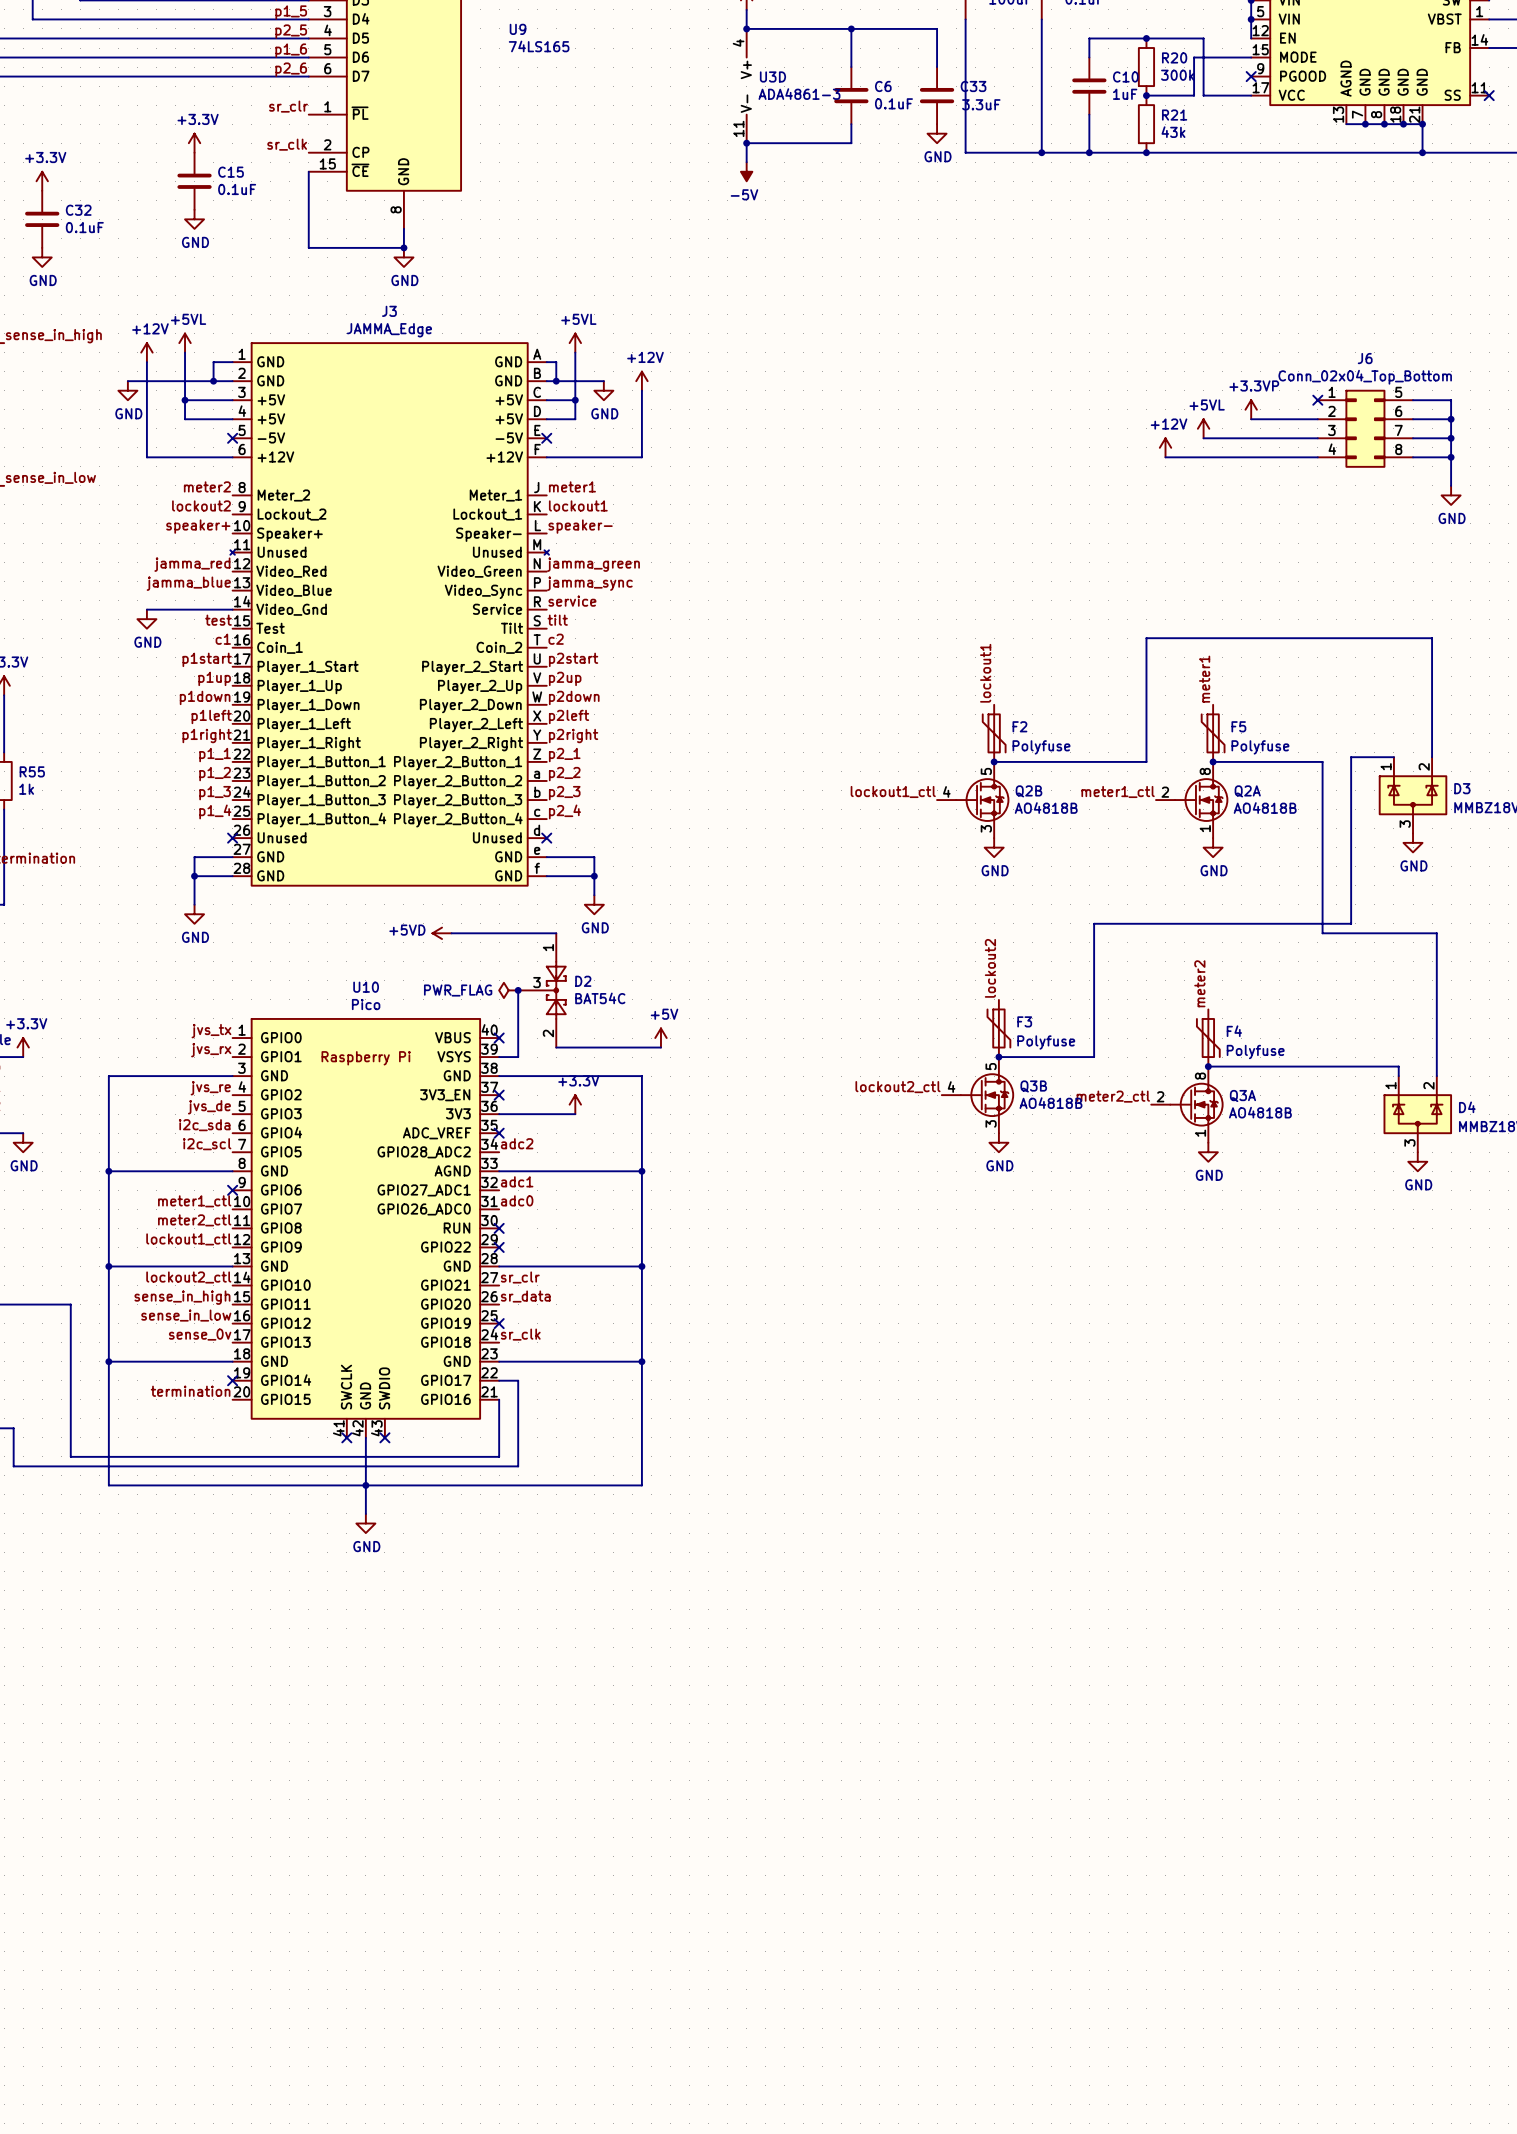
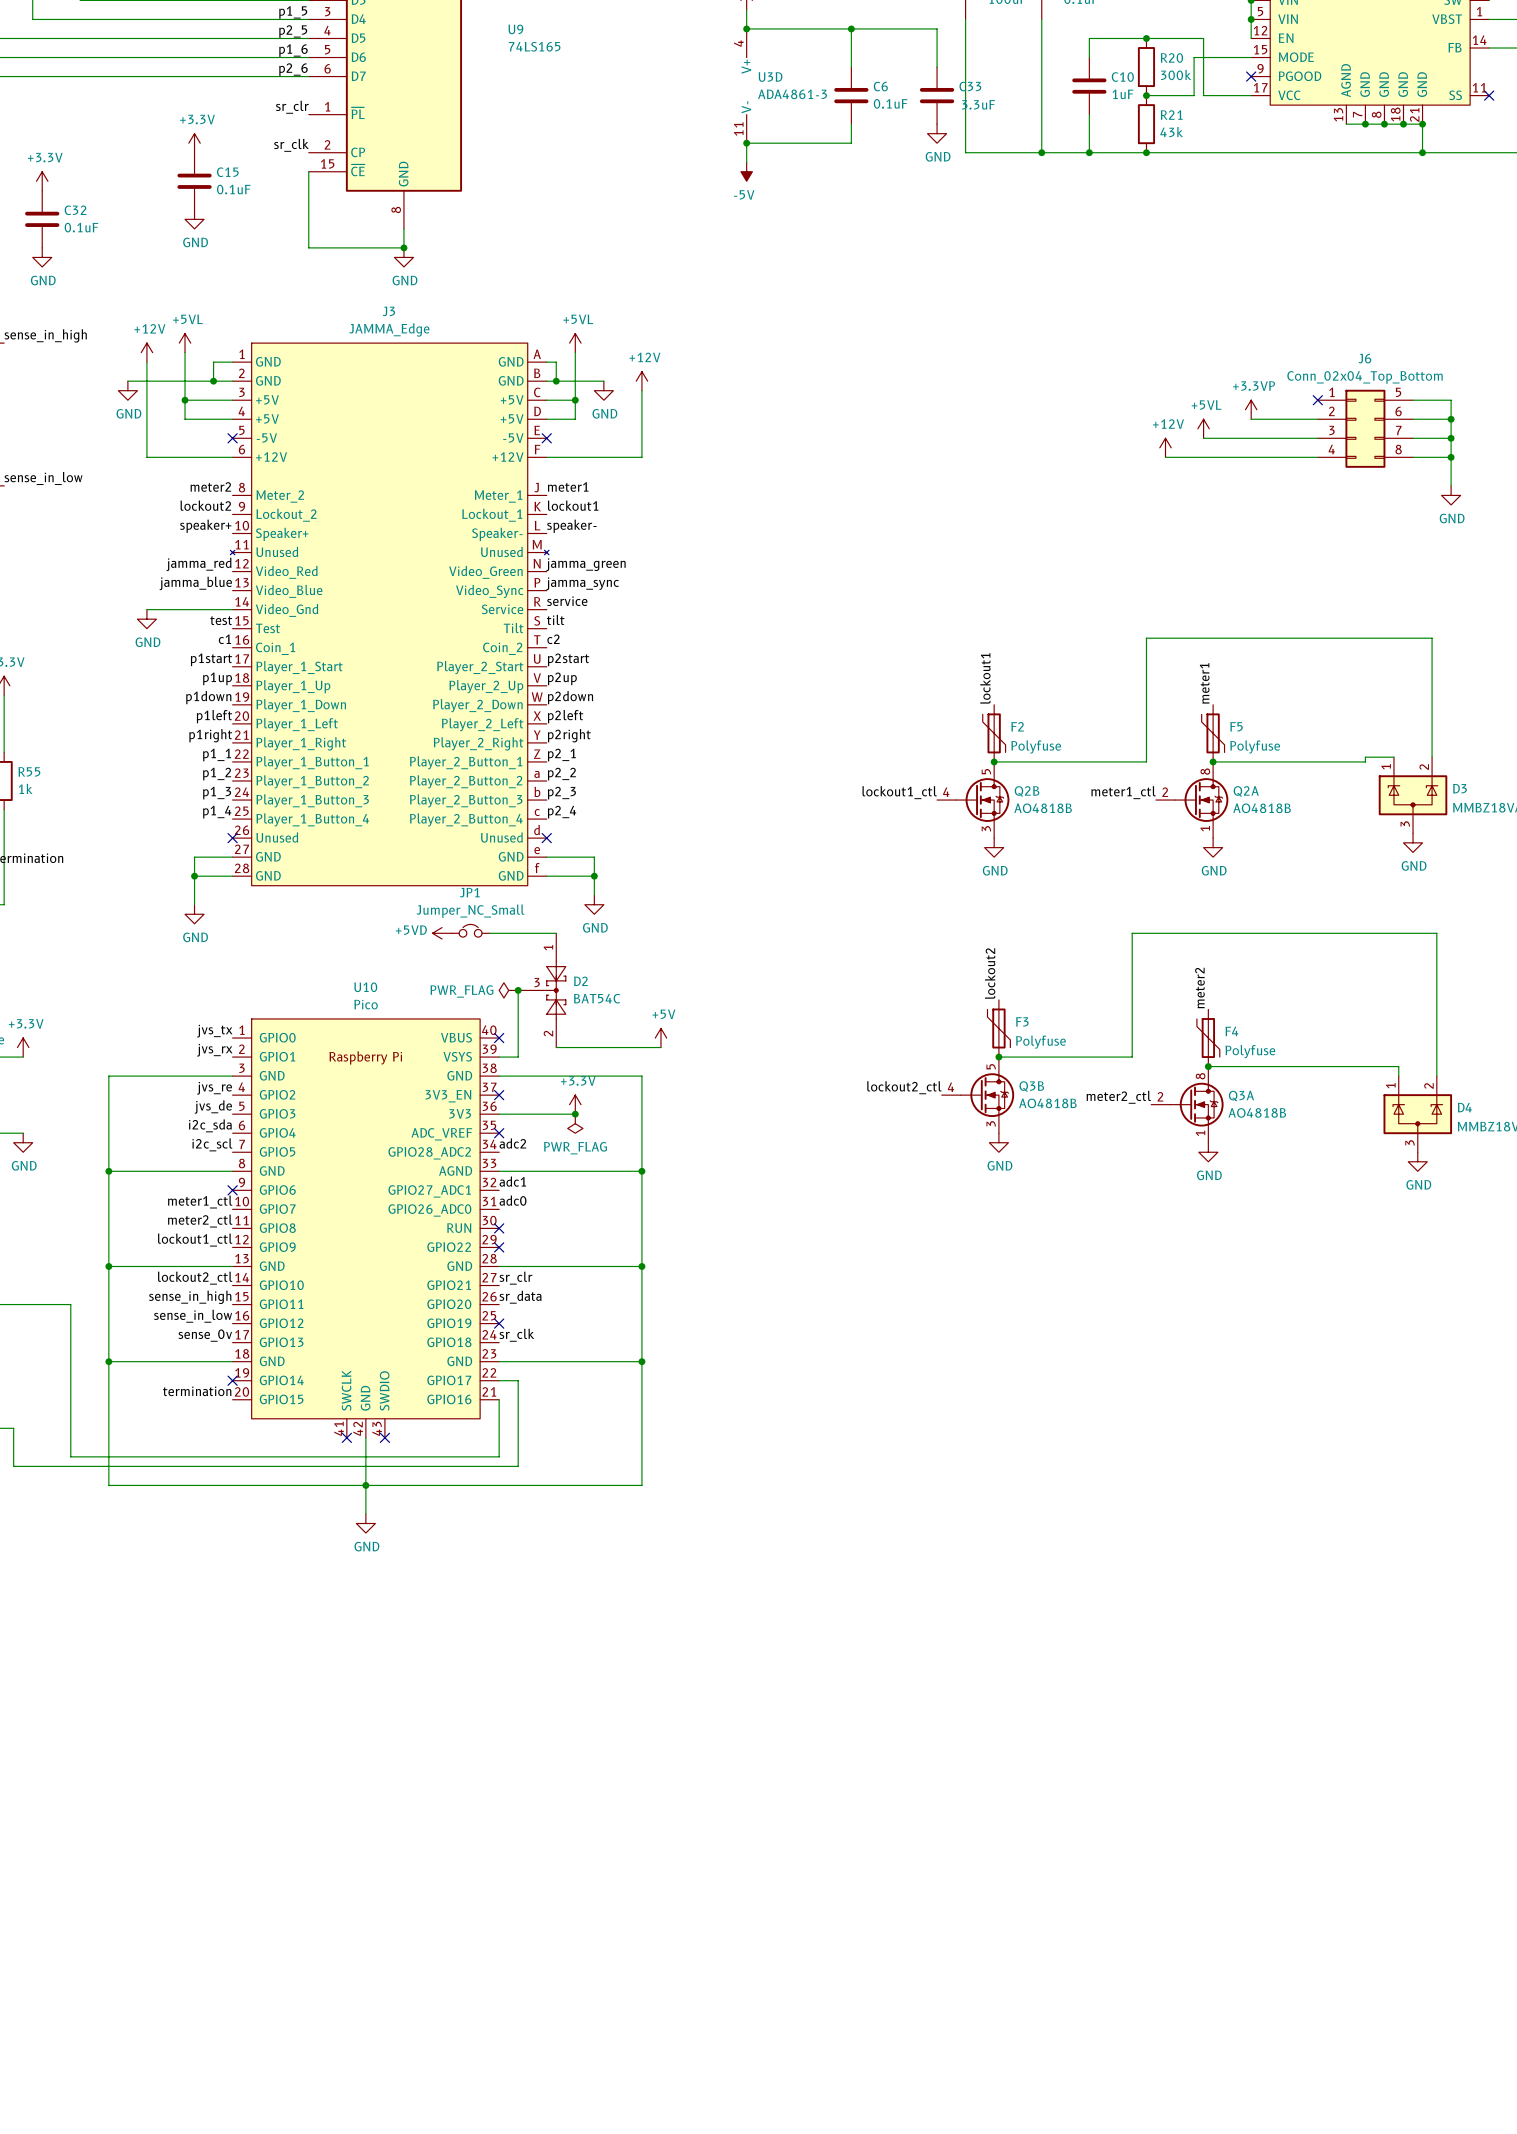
wire: (1365, 757) (1351, 757) (1351, 923) (1094, 923) (1094, 1057) -> (1322, 933) (1132, 933) (1132, 1057) (1094, 1057)
wire: (1322, 761) (1322, 933) -> (1322, 761) (1365, 761) (1365, 757)
JP1: none -> Jumper_NC_Small (470, 930)
junction: none -> (575, 1114)
power symbol: none -> PWR_FLAG (575, 1123)

